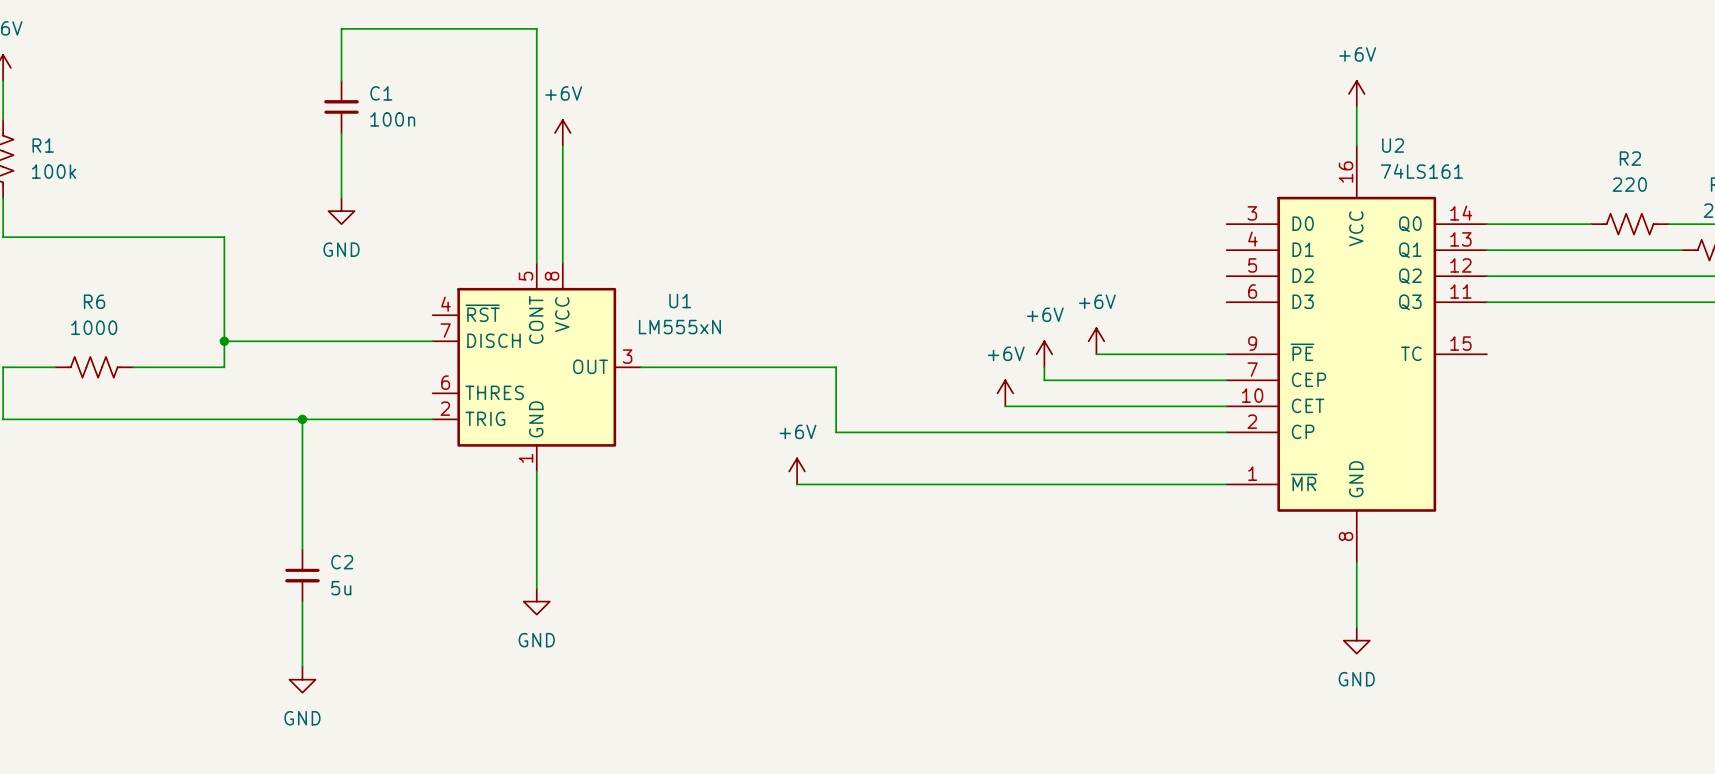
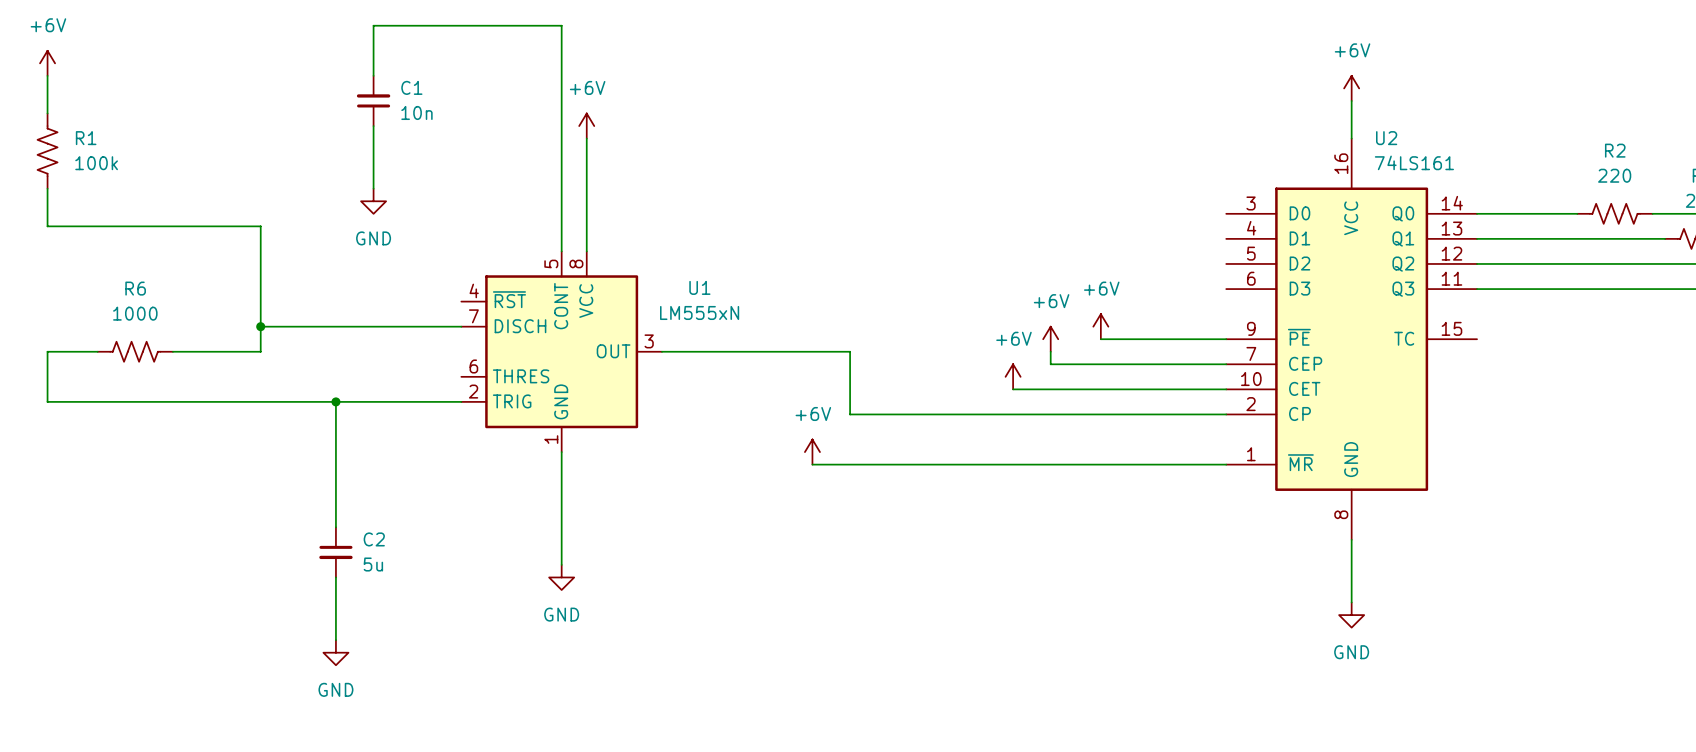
C1 value: 100n (392, 119) -> 10n (416, 112)

